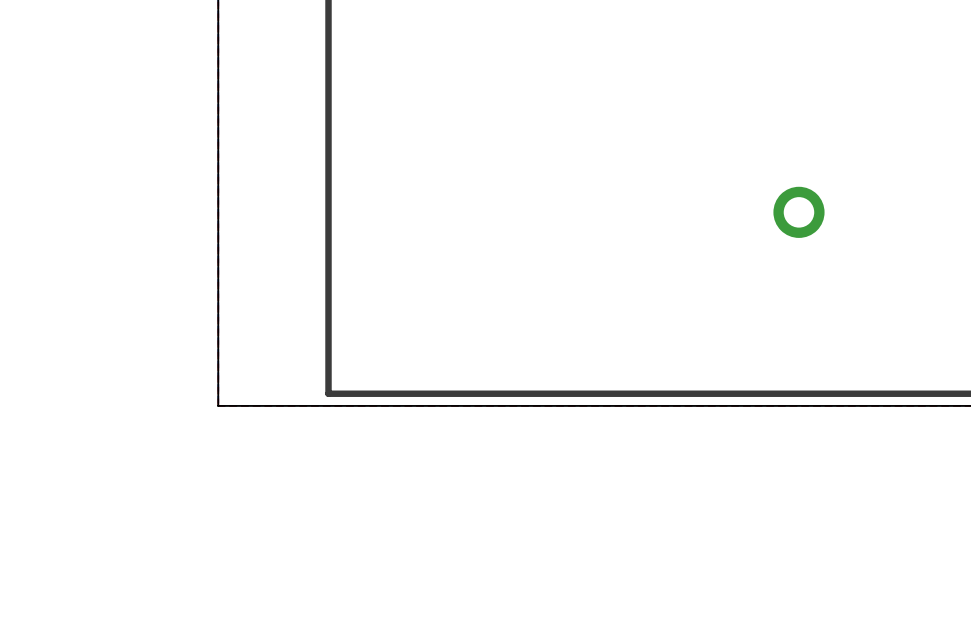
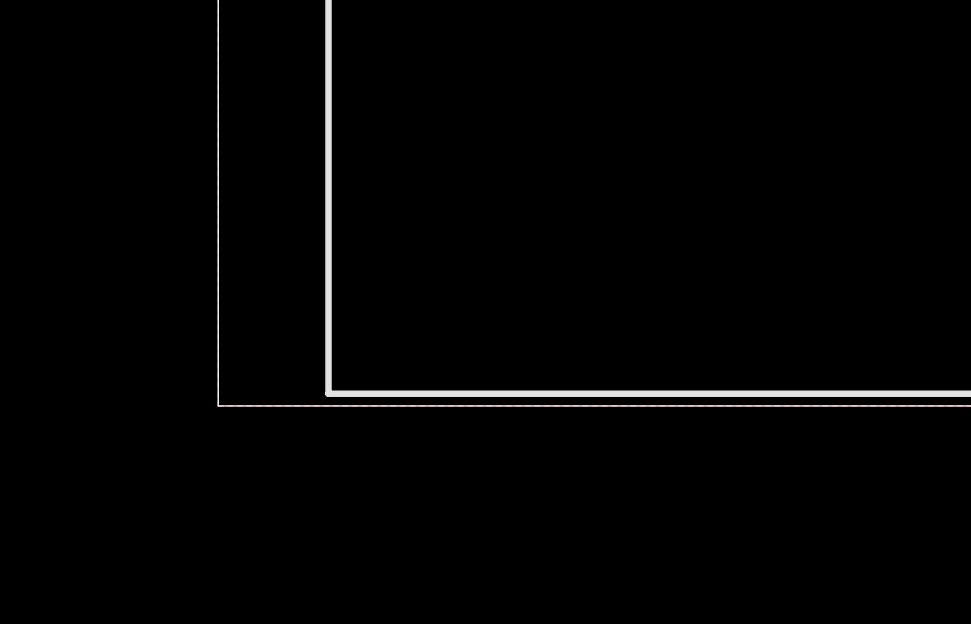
via: (798, 212) -> none

